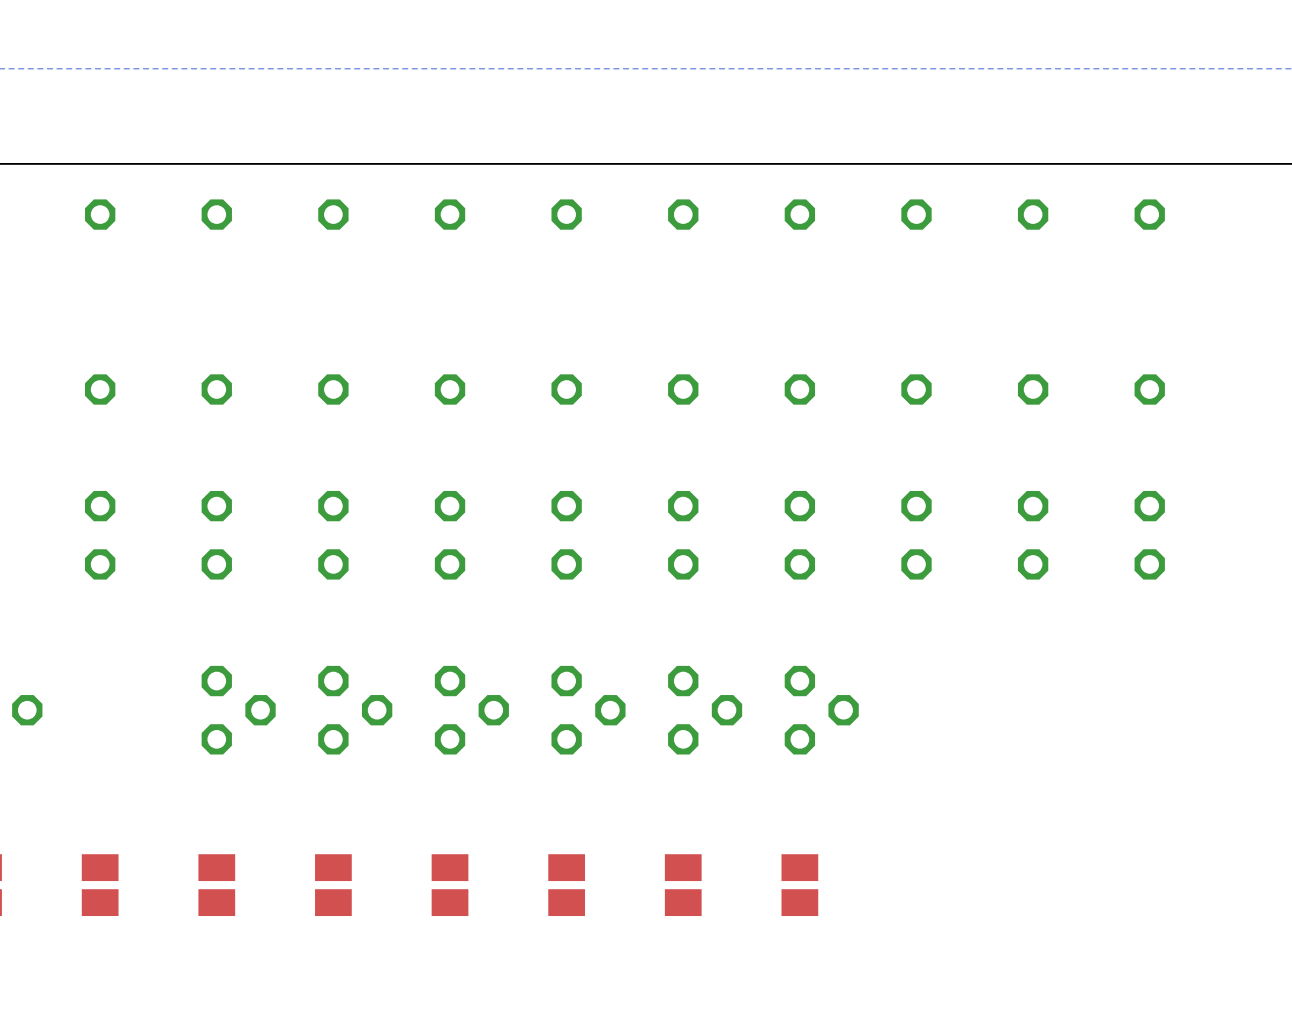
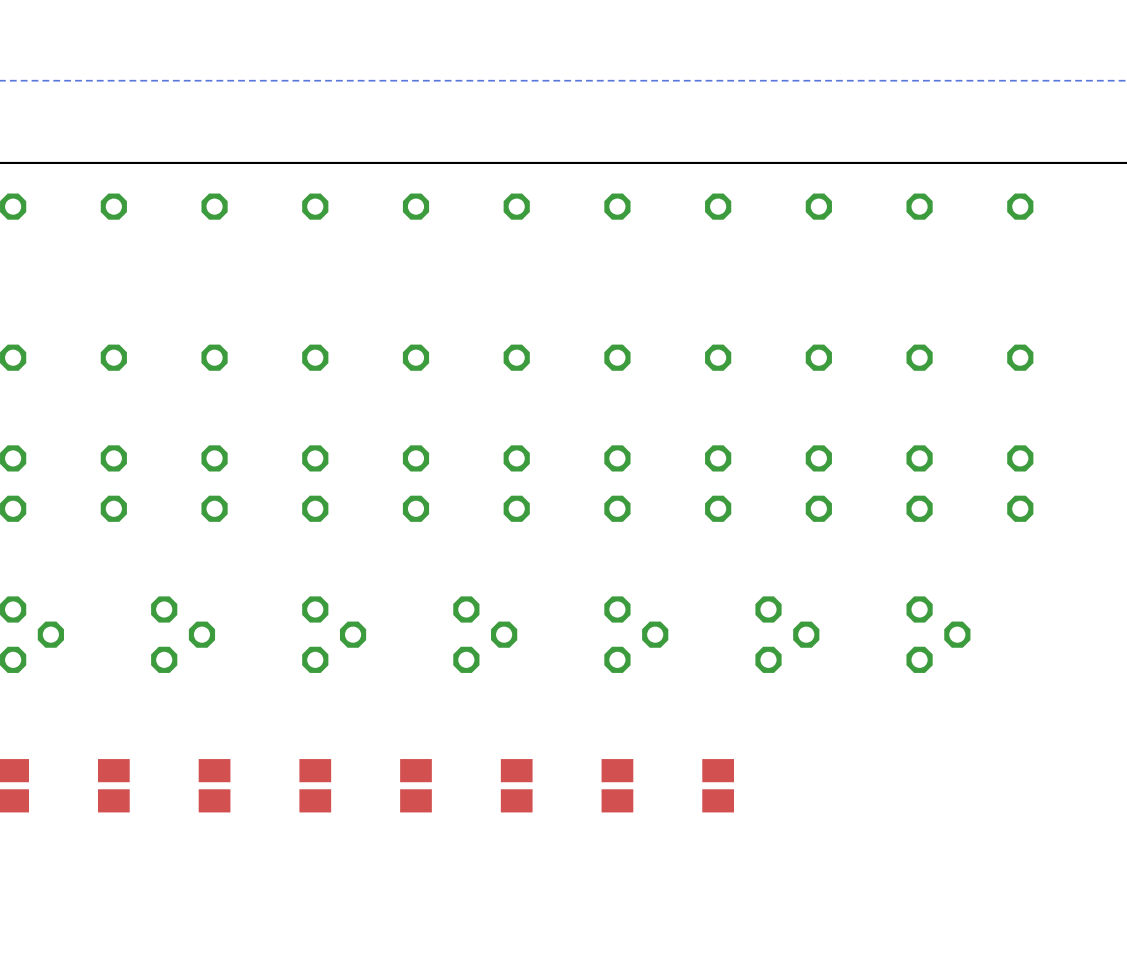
part position: (238, 710) -> (183, 634)
part: (471, 710) -> none
part: none -> (485, 634)
part: (588, 710) -> none
part position: (821, 710) -> (787, 634)
part: none -> (938, 634)

